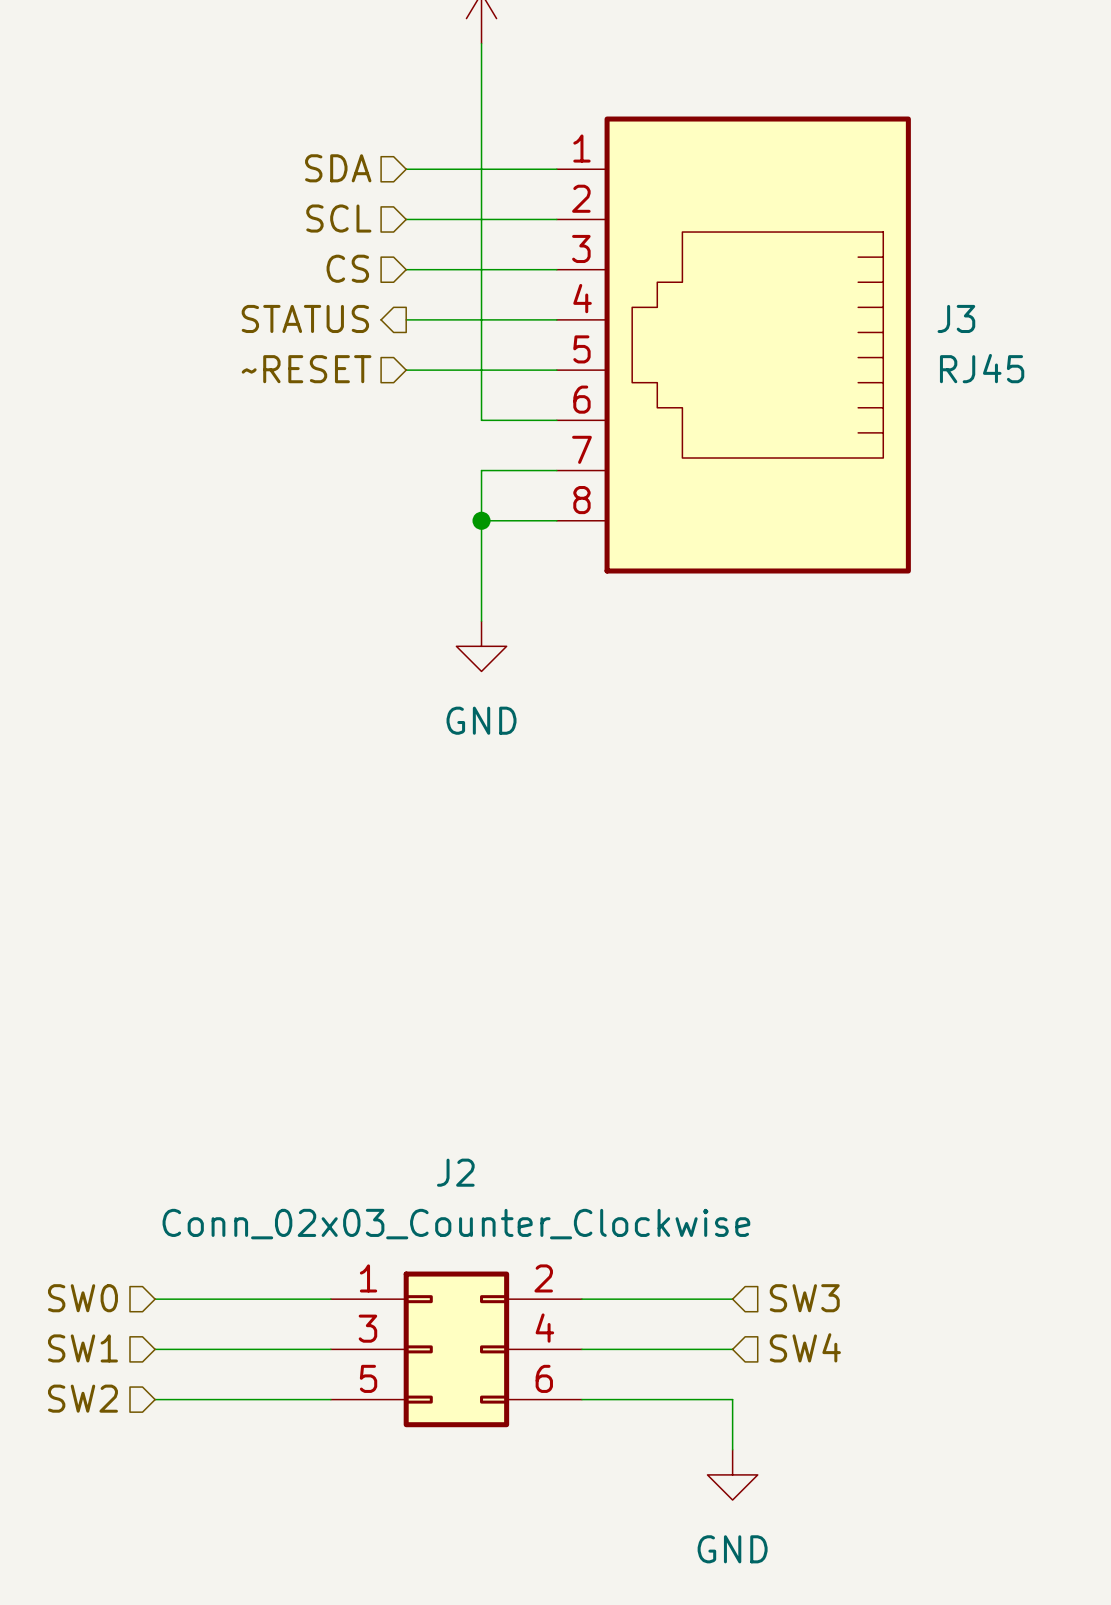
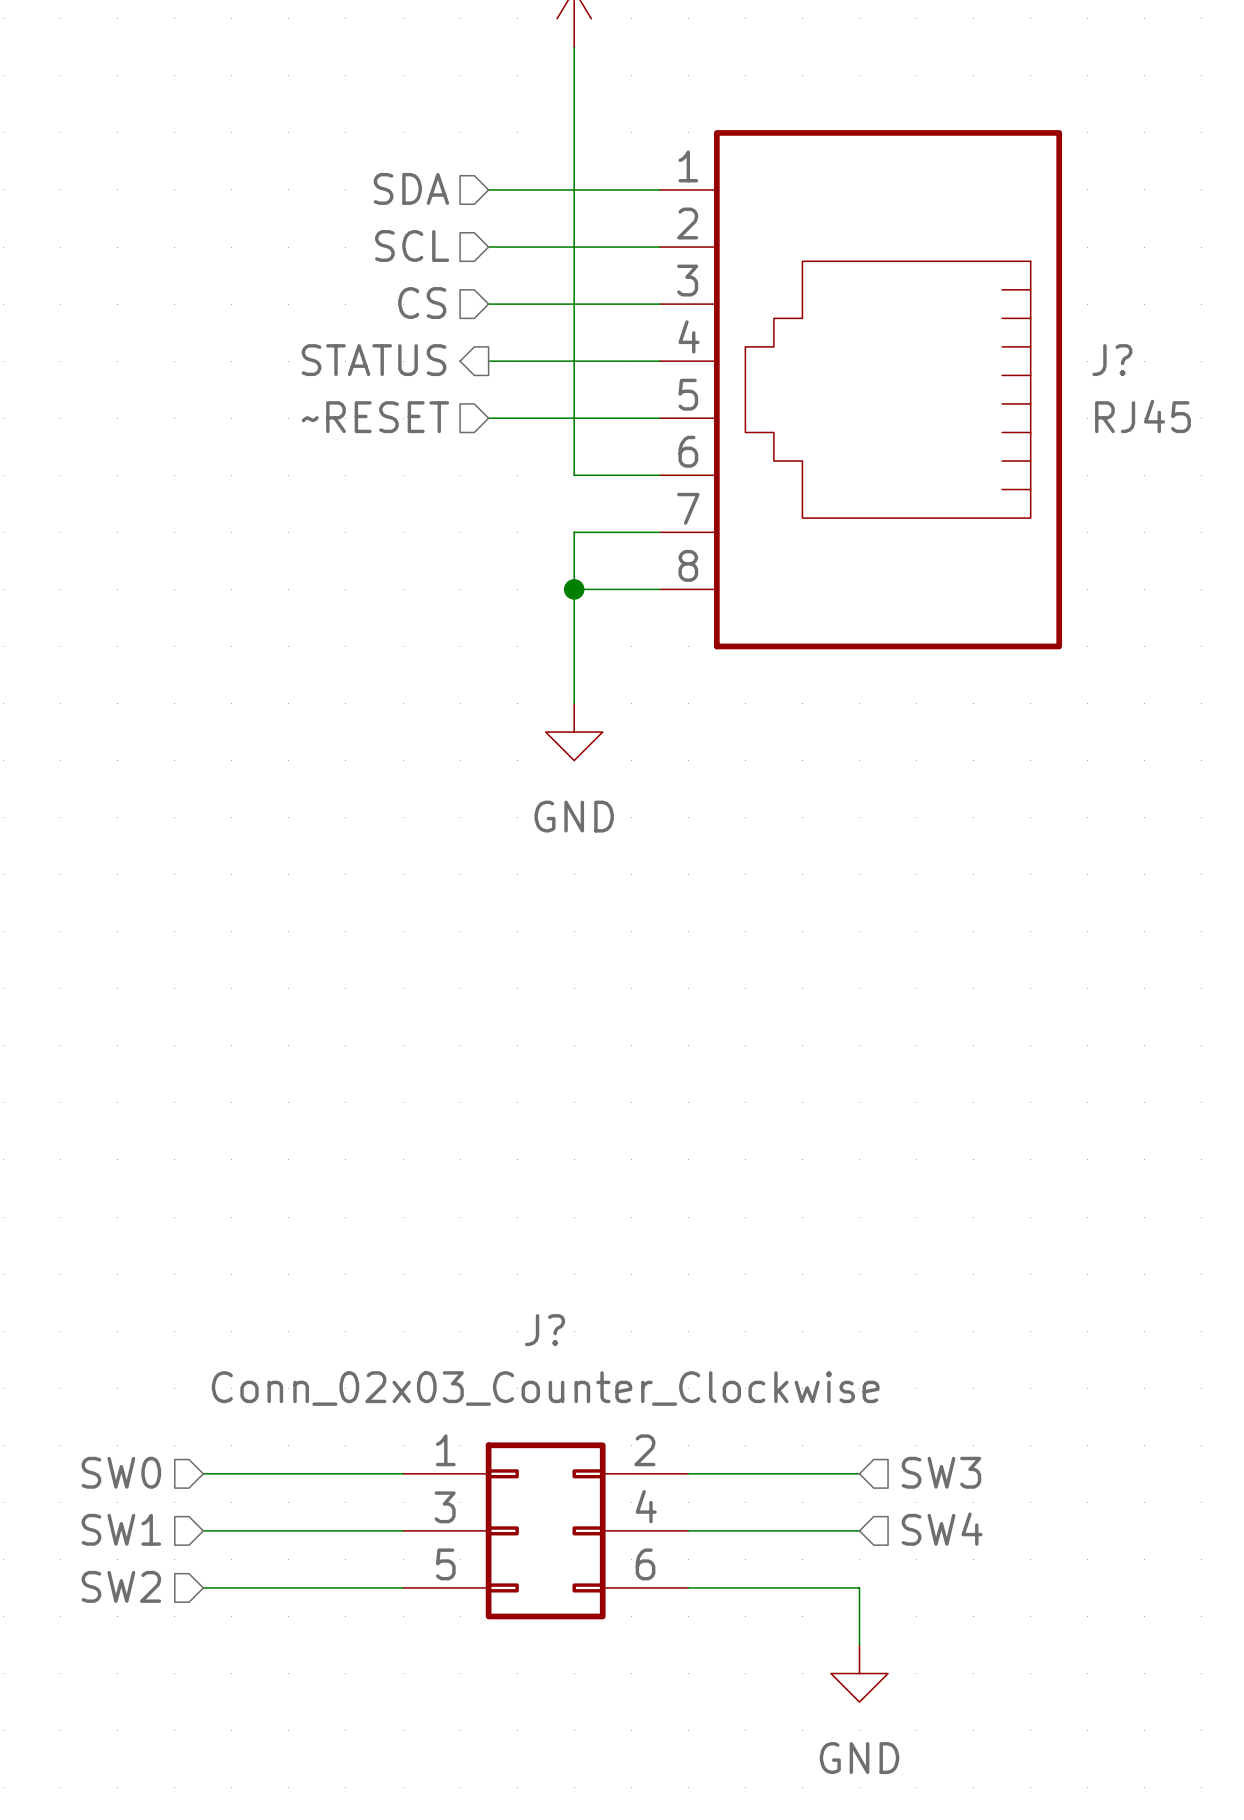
J3 name: J3 (956, 318) -> J? (1112, 360)
J2 name: J2 (455, 1172) -> J? (544, 1330)

